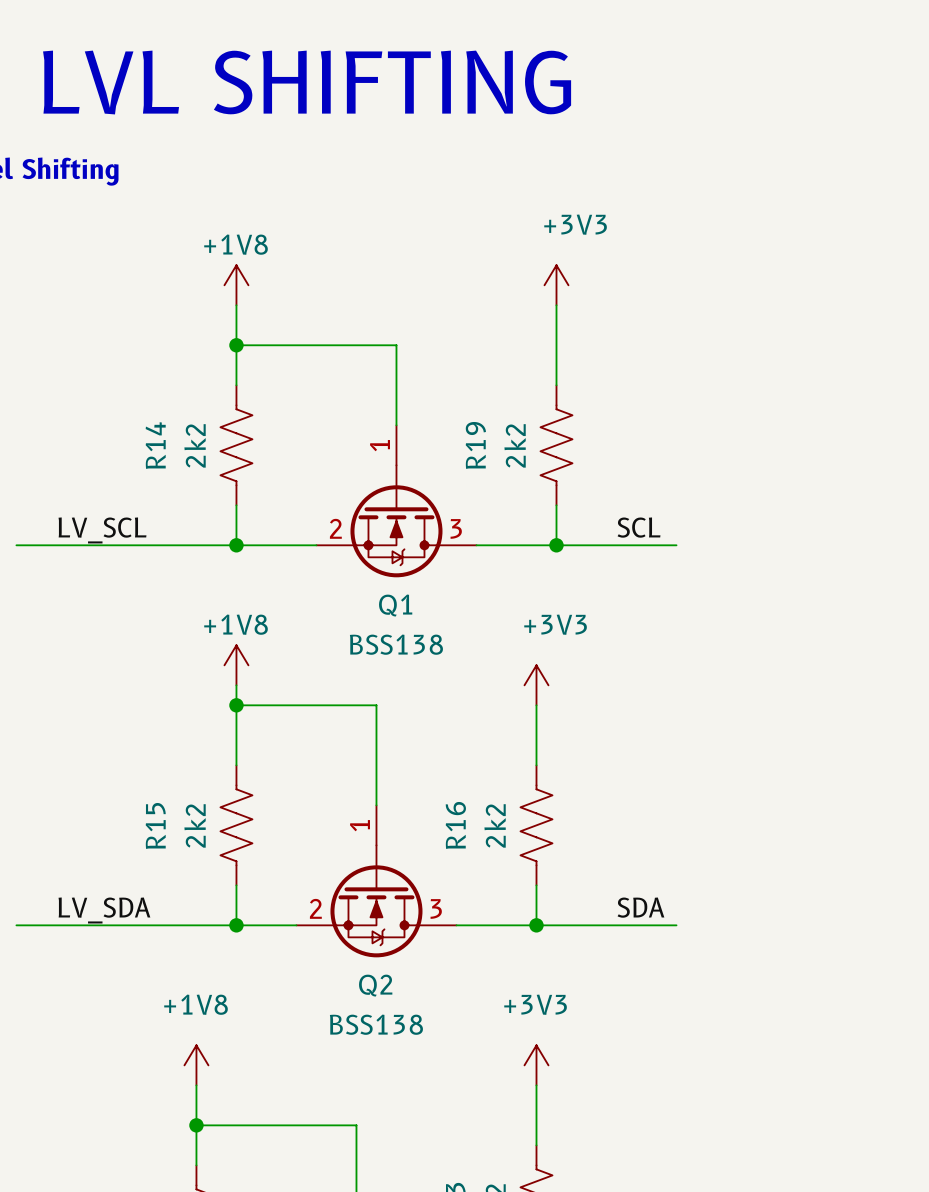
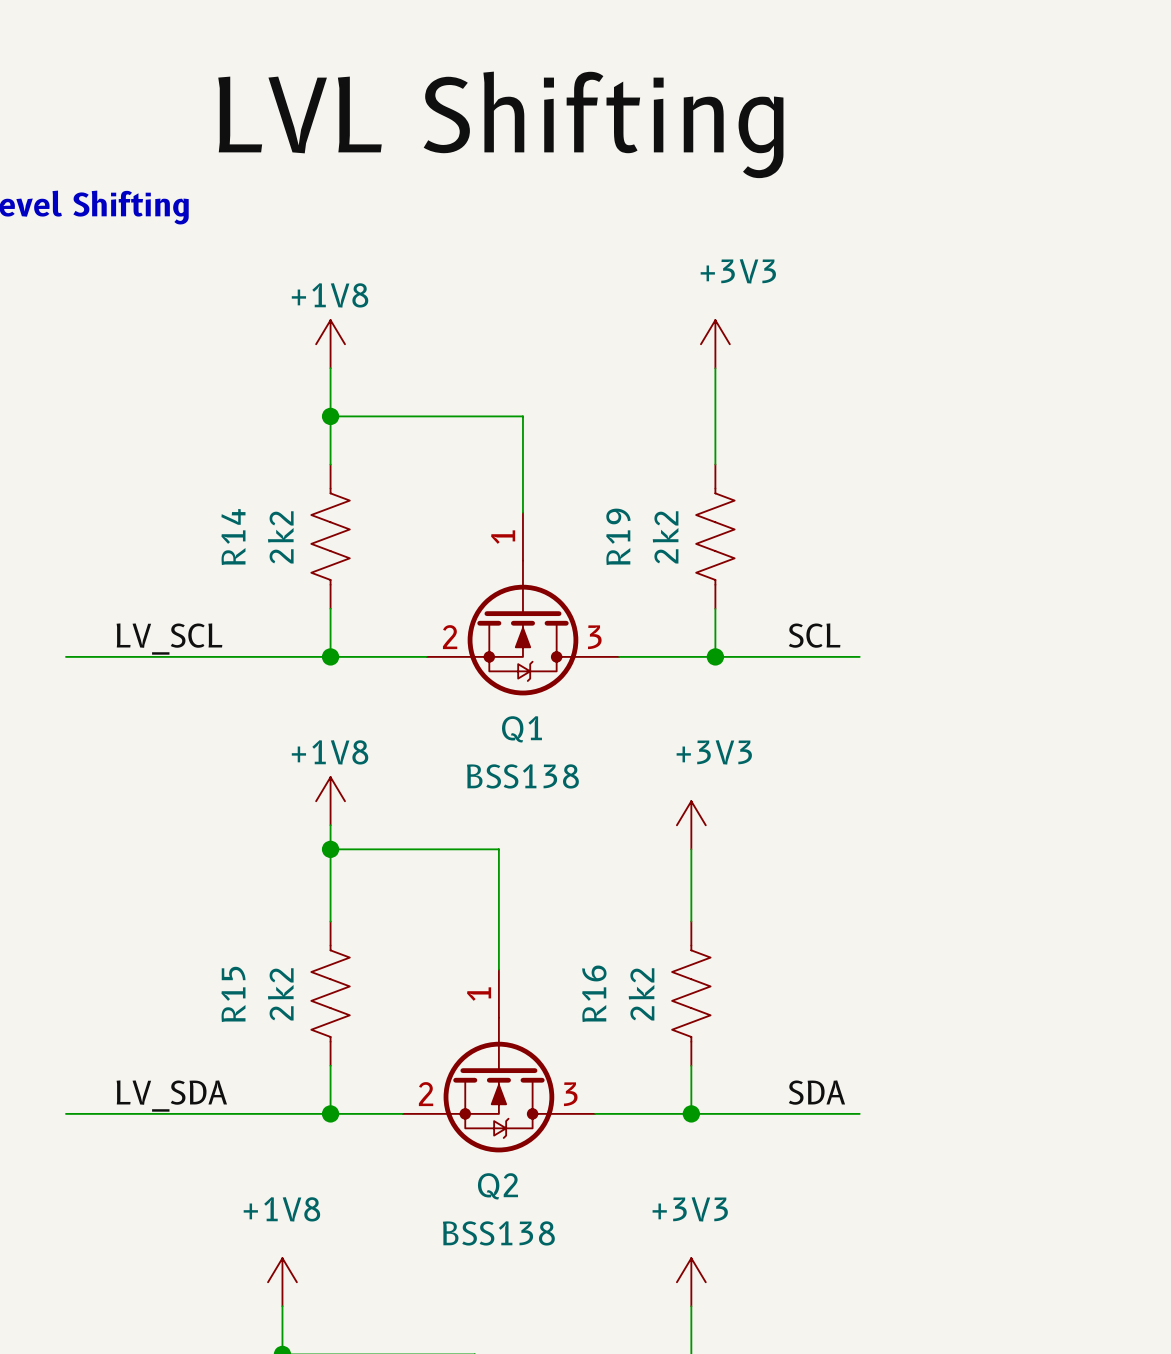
text: LVL SHIFTING (307, 82) -> none
label: none -> LVL Shifting (500, 124)

